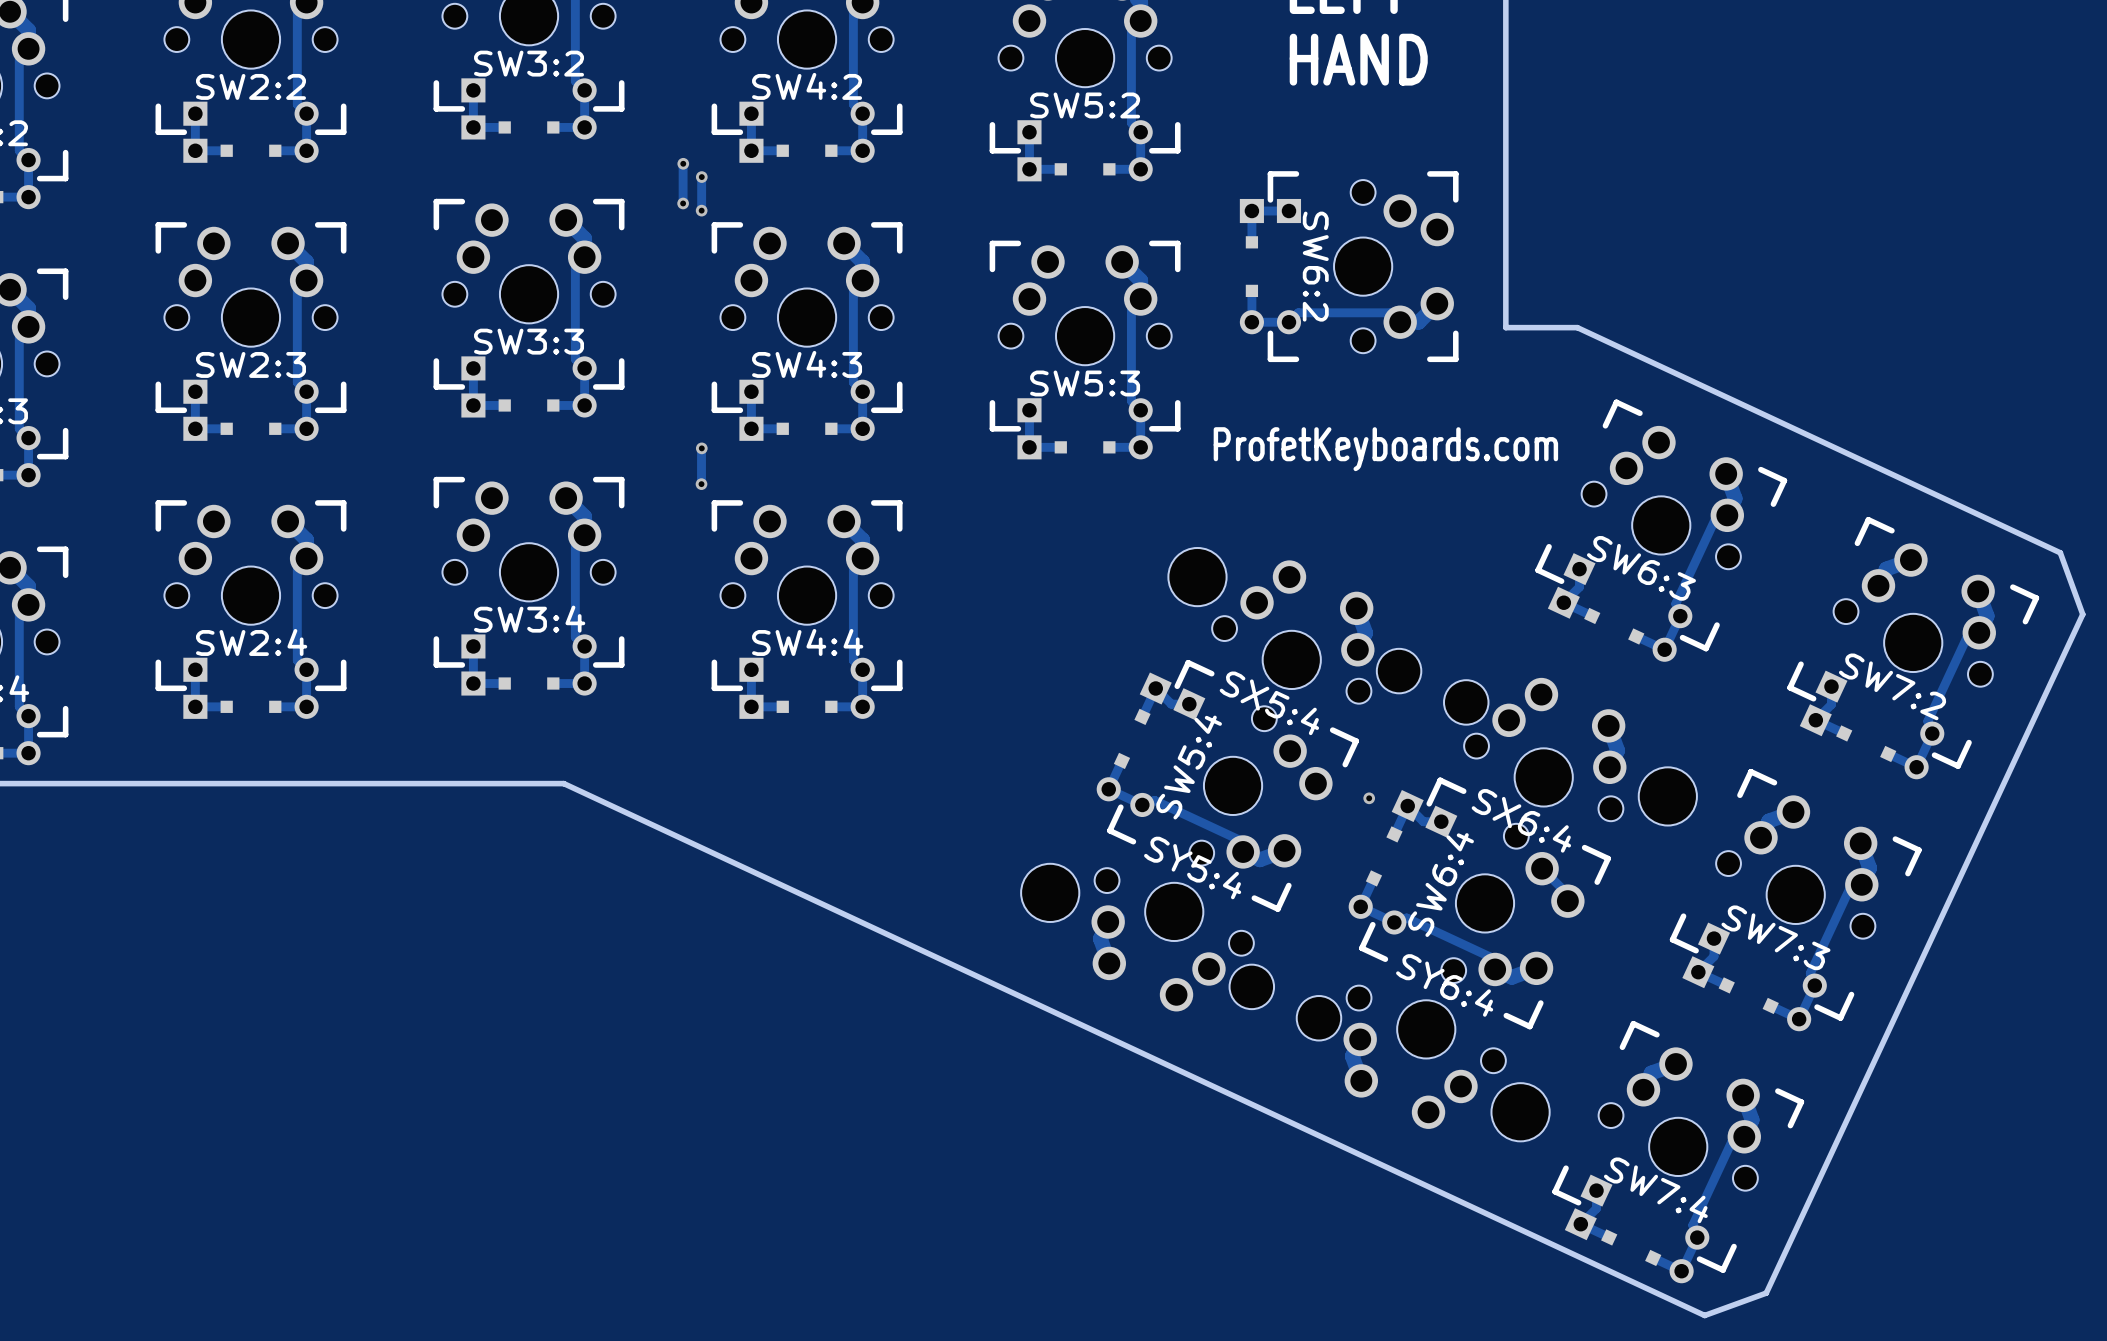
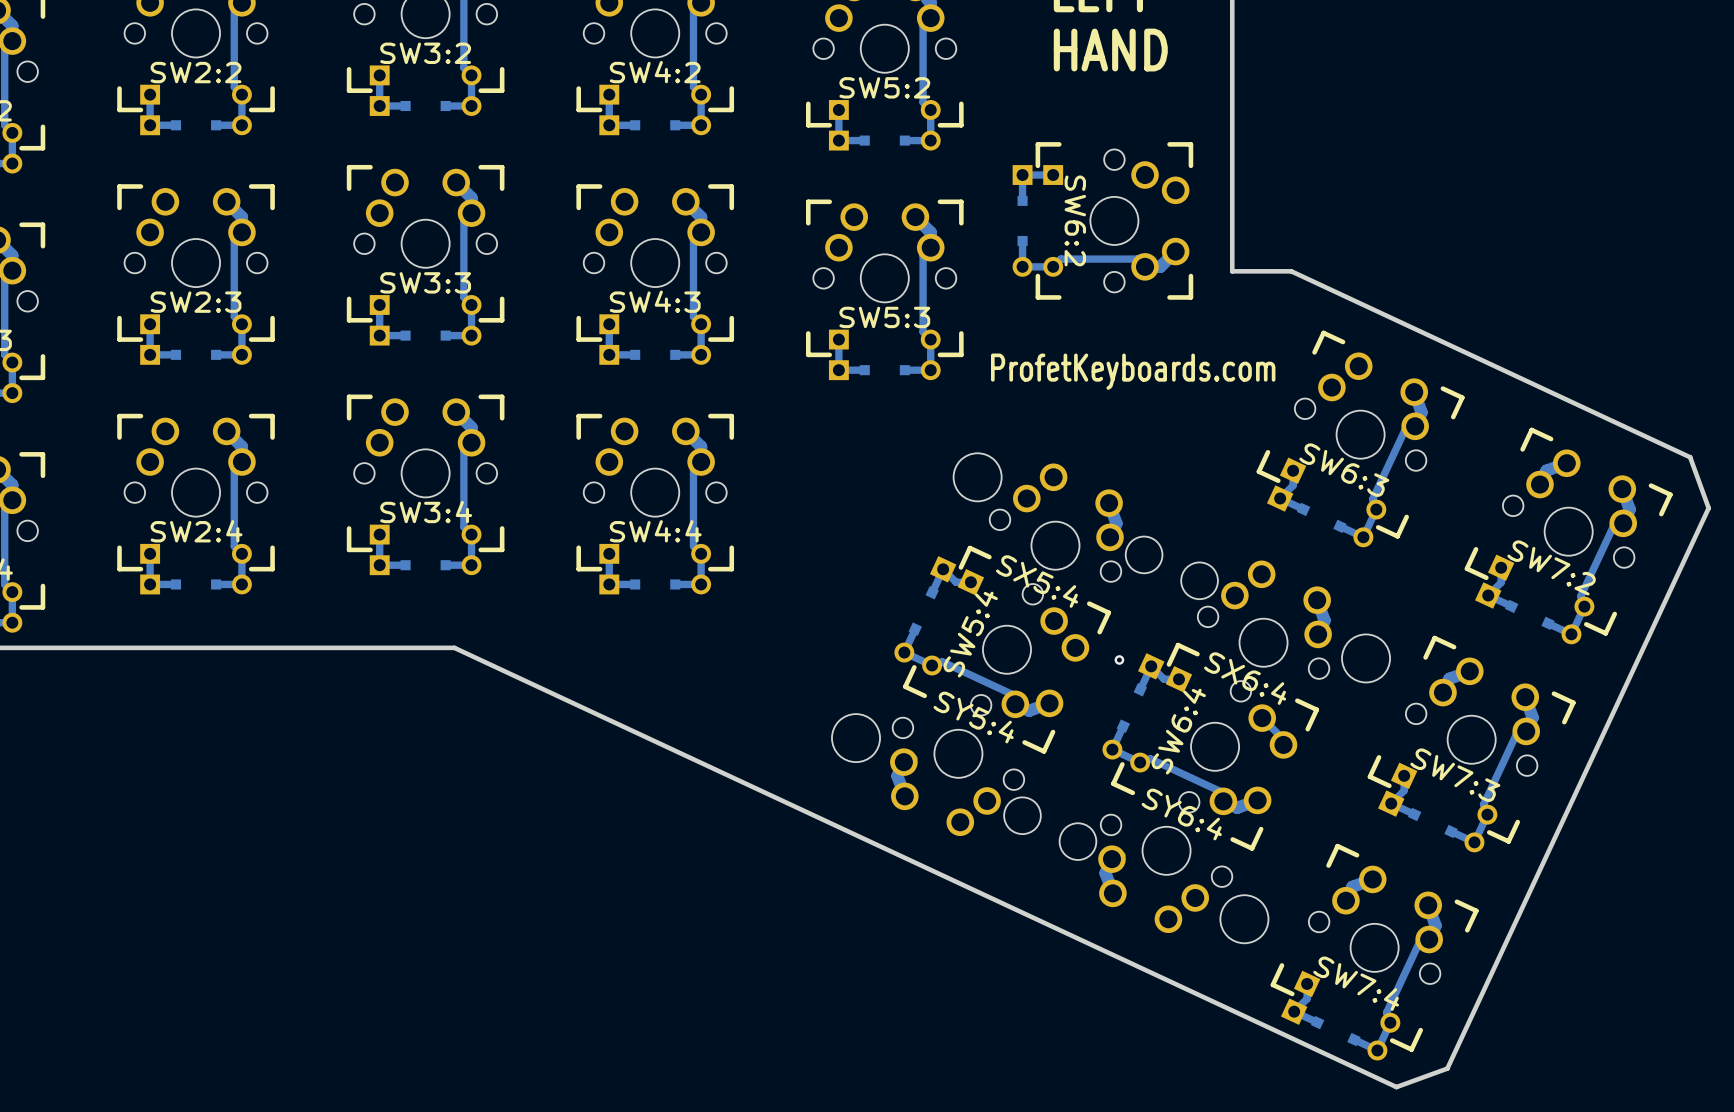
track: (683, 163) (683, 203) -> none
via: (683, 163) -> none
track: (701, 177) (701, 210) -> none
via: (701, 177) -> none
via: (683, 203) -> none
via: (701, 210) -> none
track: (701, 448) (701, 484) -> none
via: (701, 448) -> none
via: (701, 484) -> none

